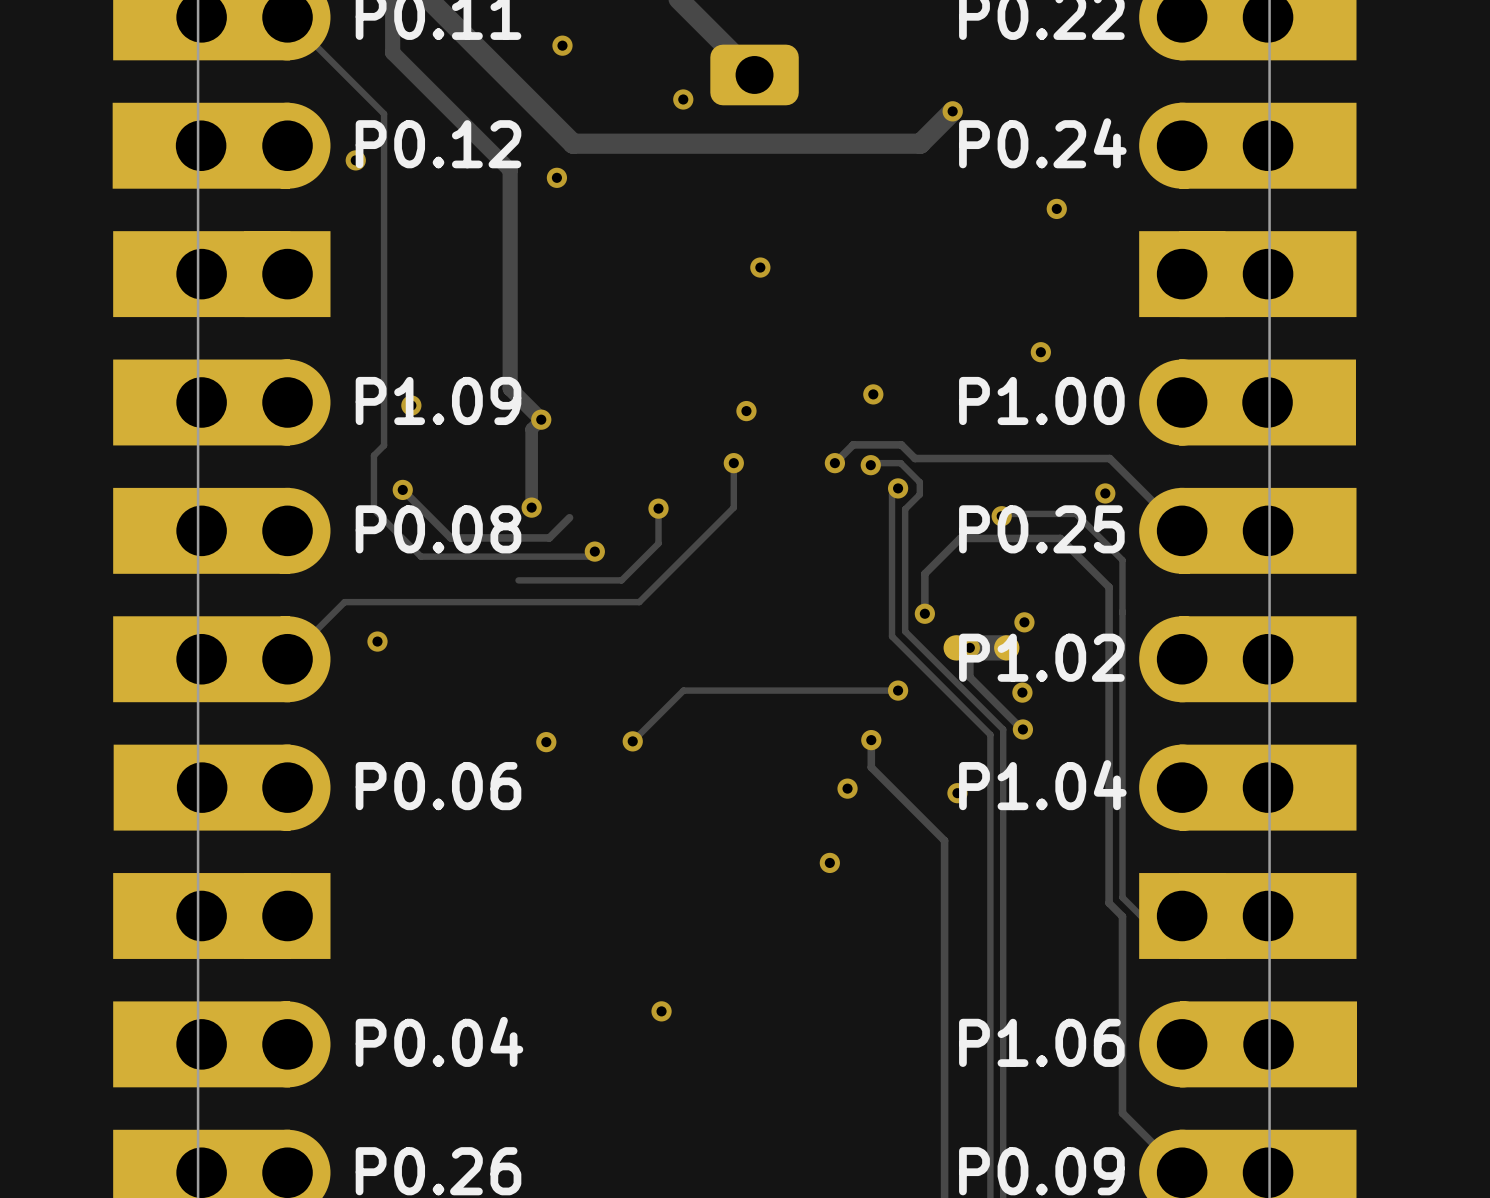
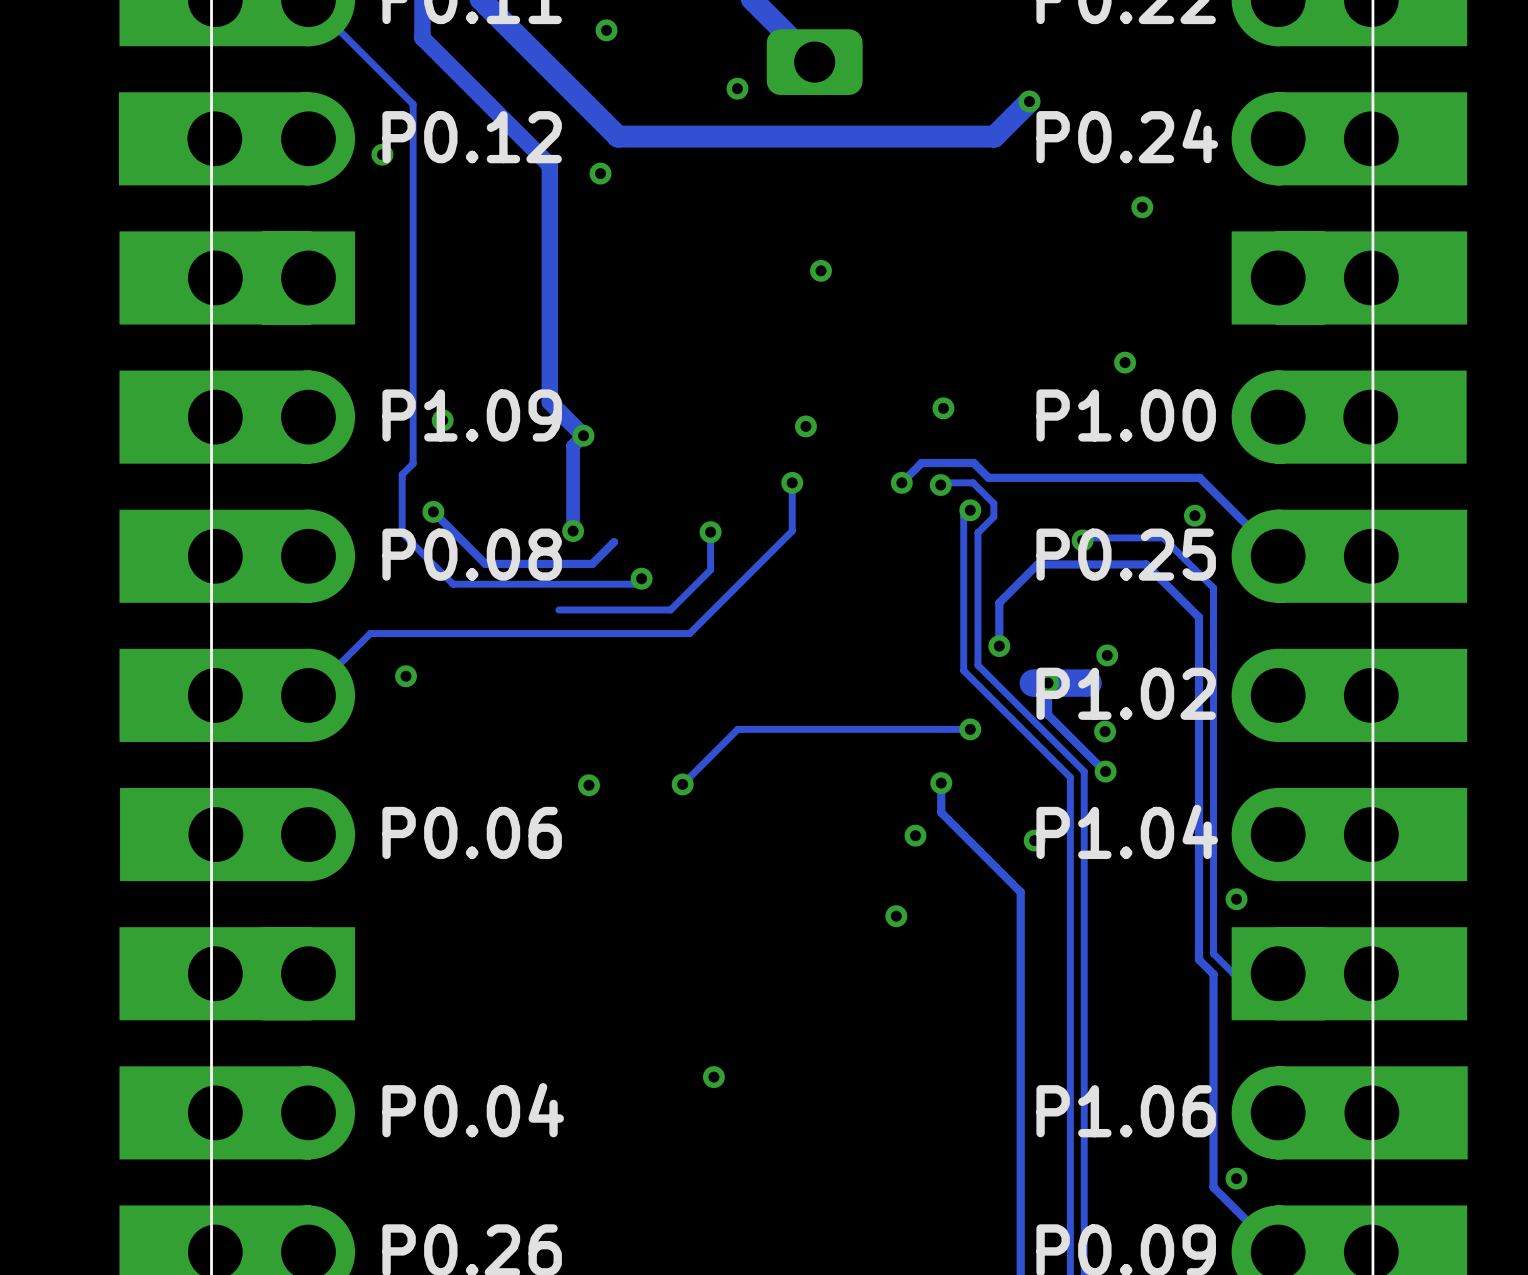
via: none -> (1236, 899)
via: none -> (1236, 1178)

